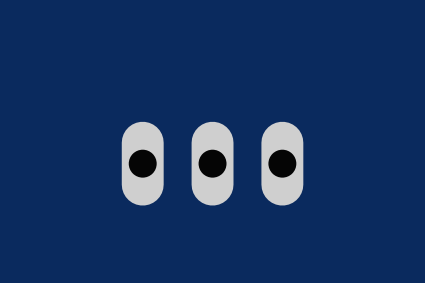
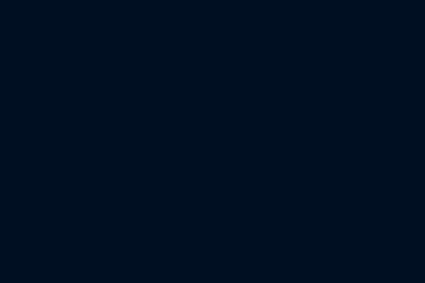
part: (212, 163) -> none

